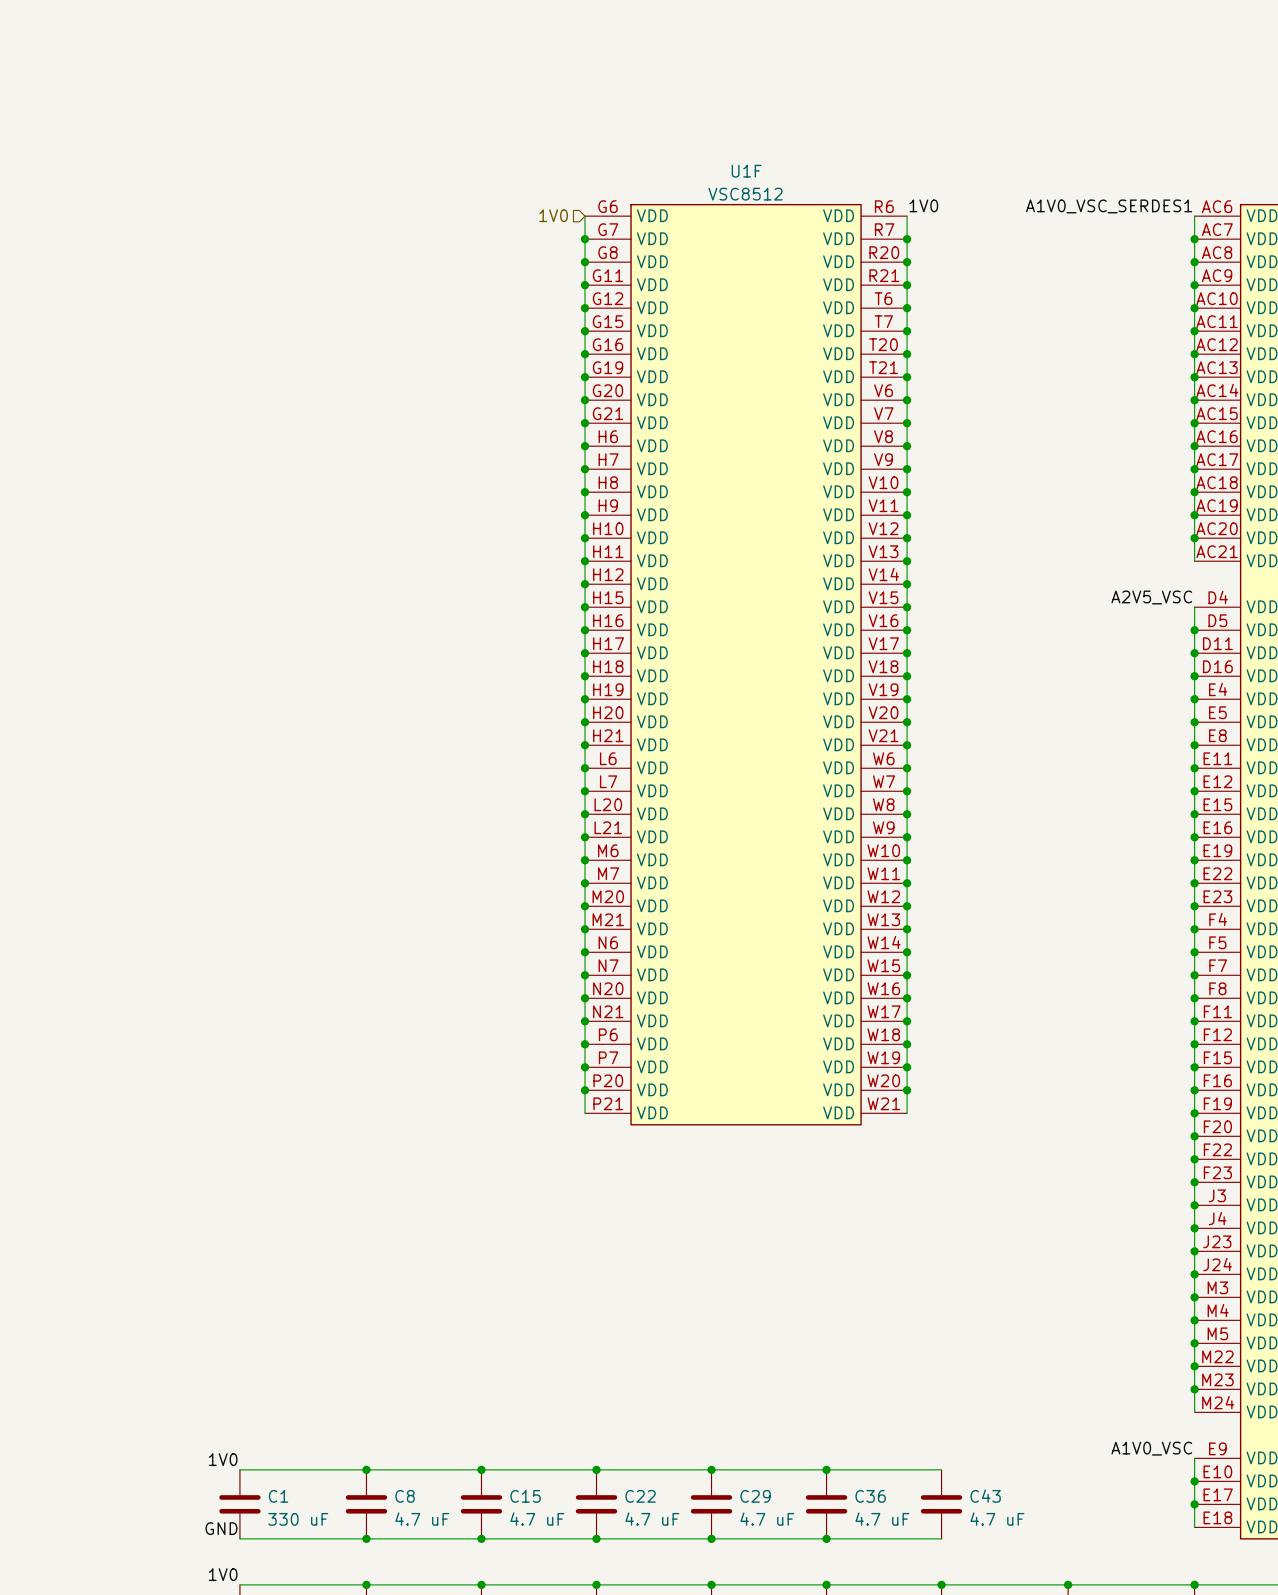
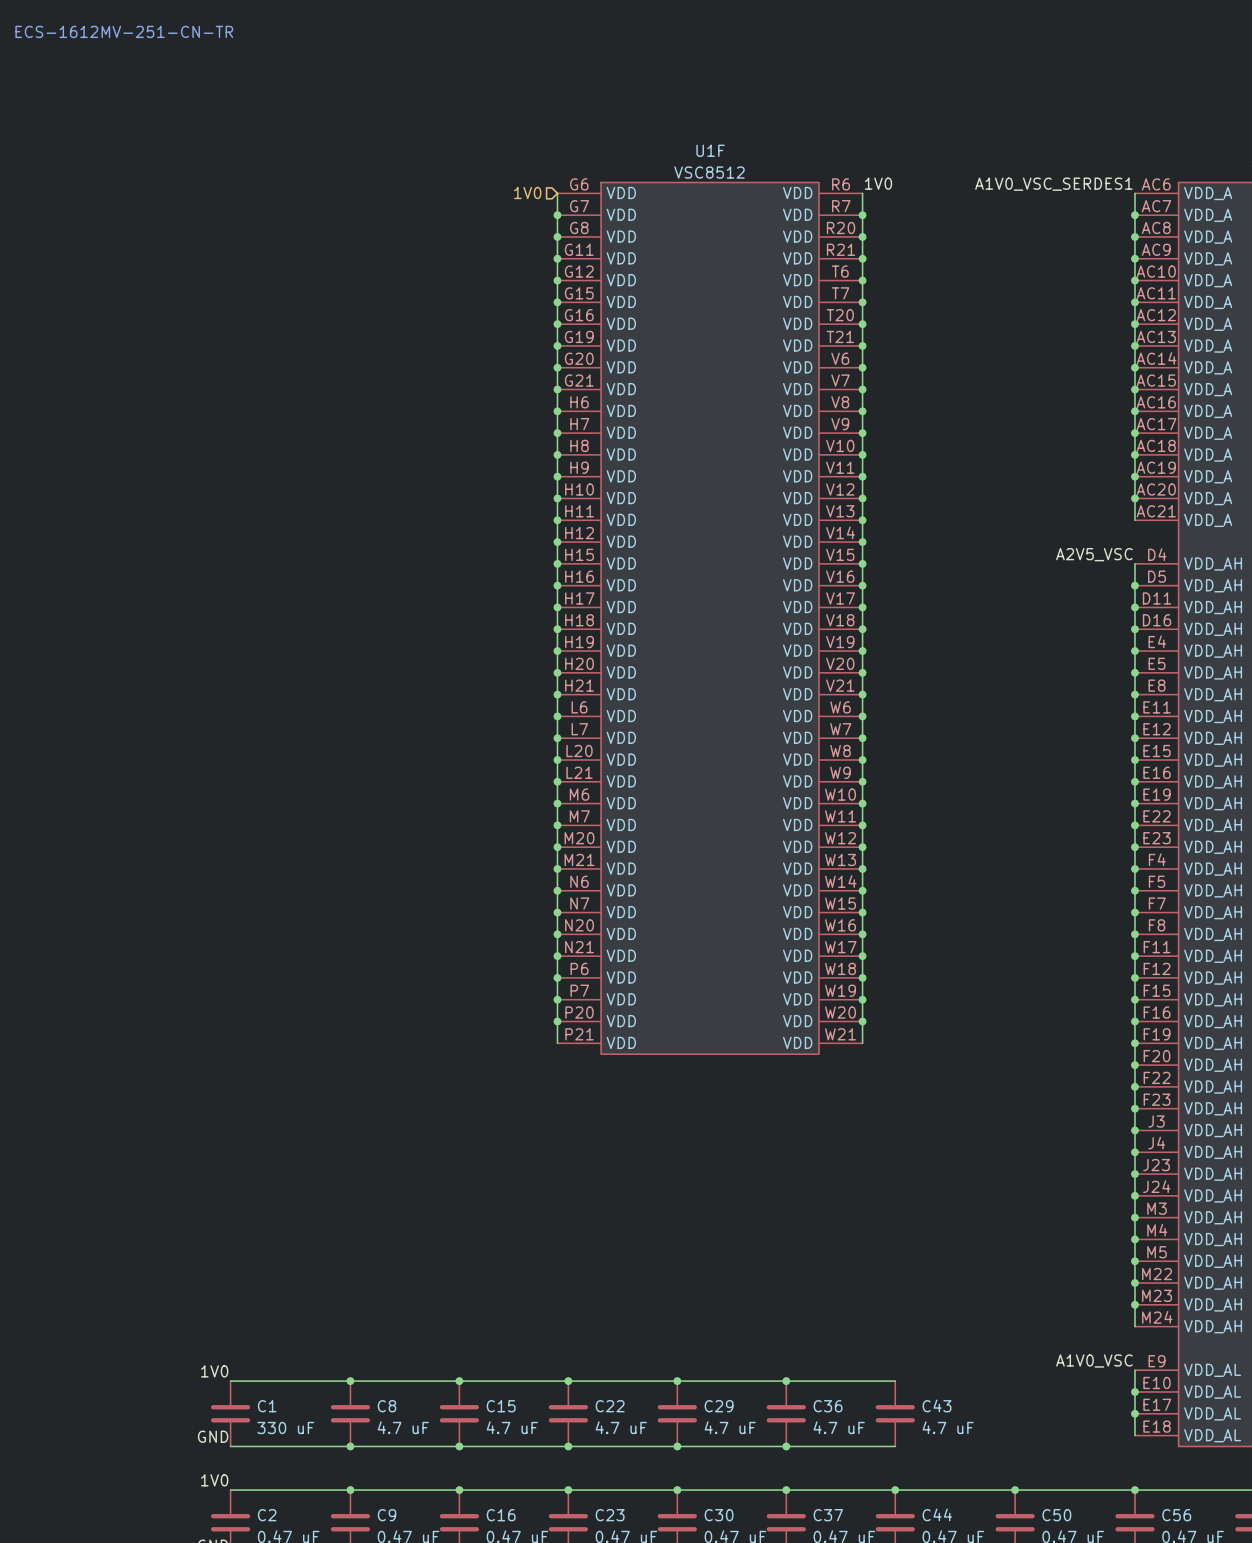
text: none -> ECS-1612MV-251-CN-TR (124, 31)

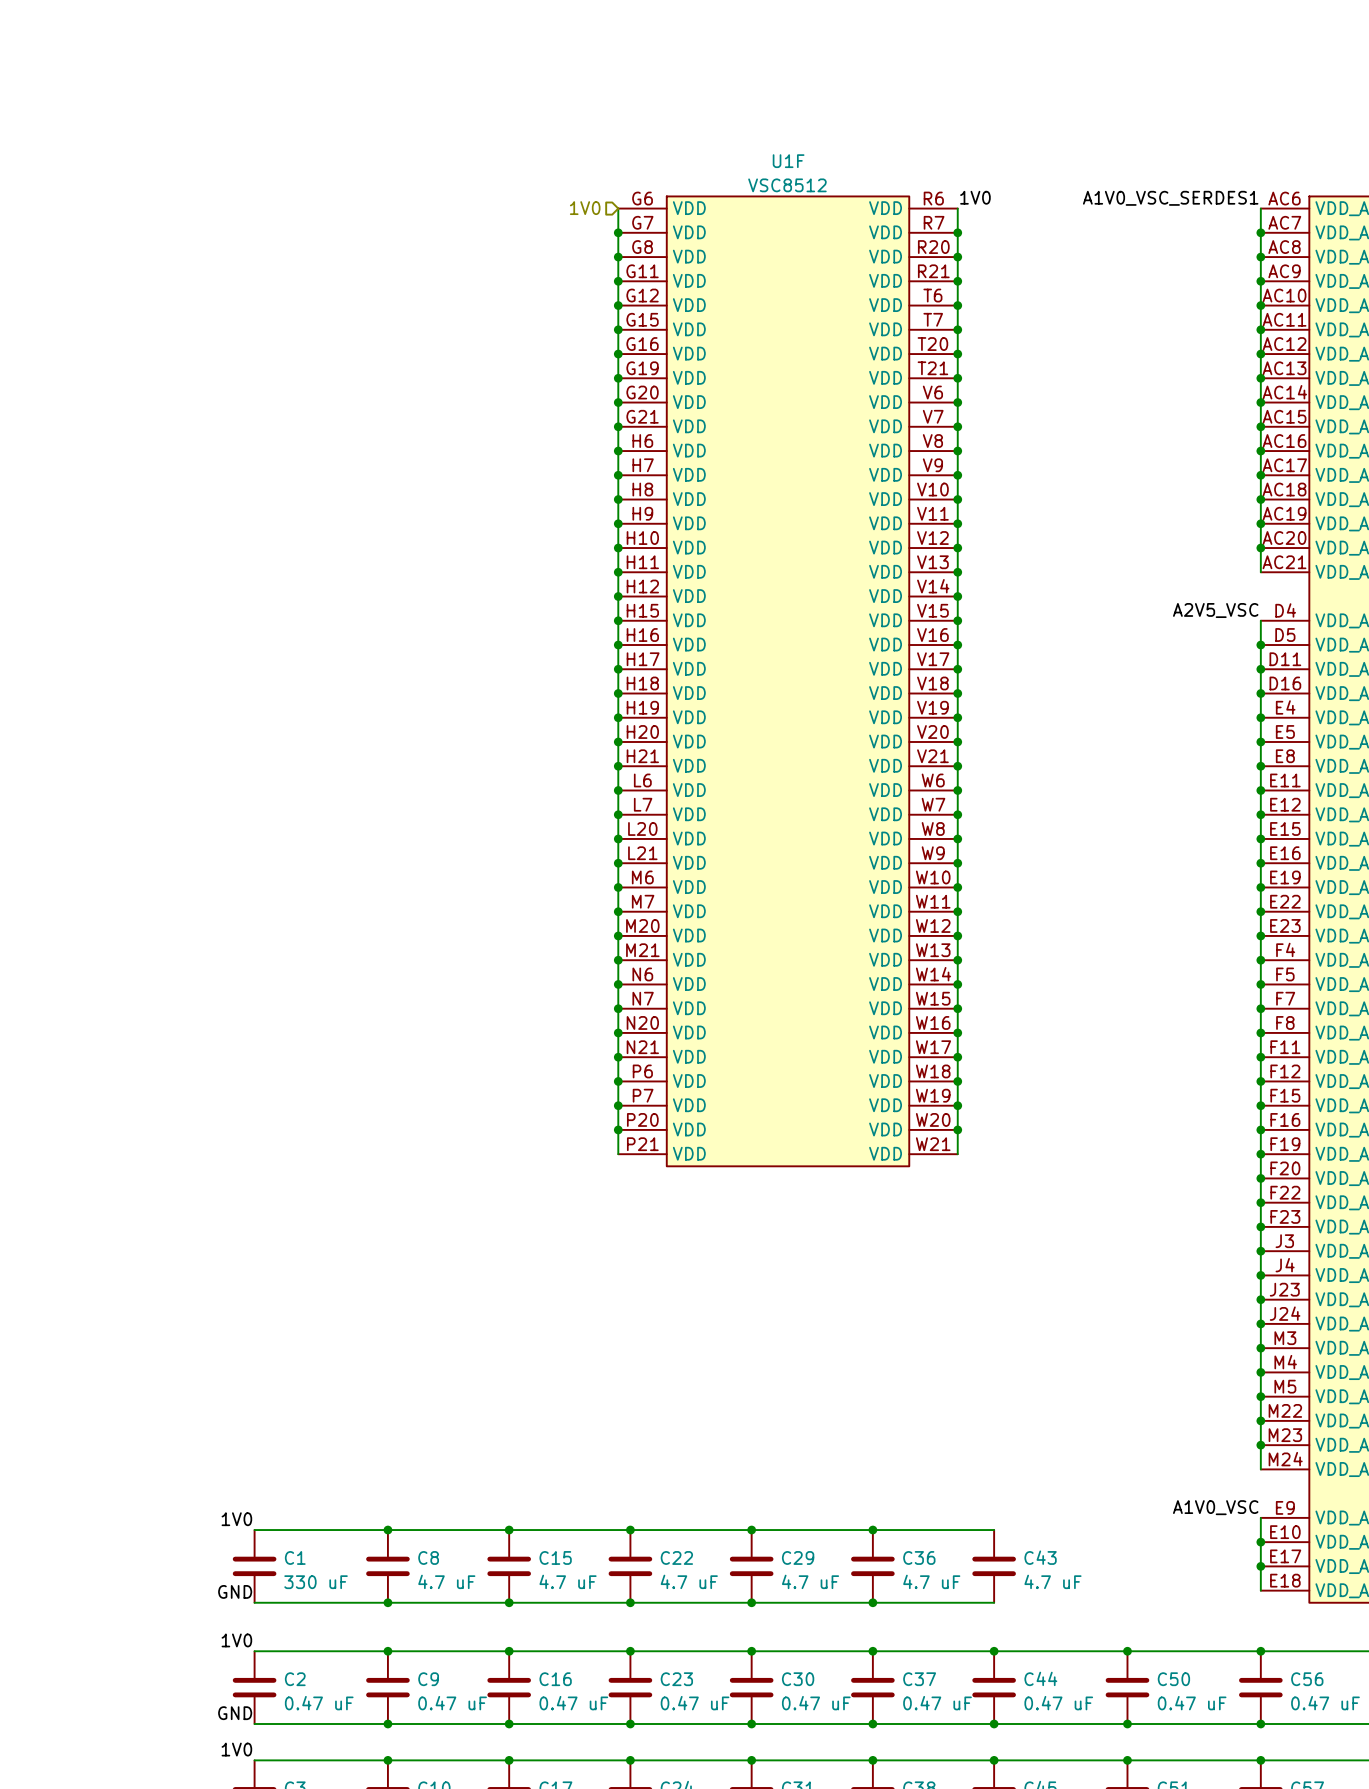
text: ECS-1612MV-251-CN-TR (124, 31) -> none

